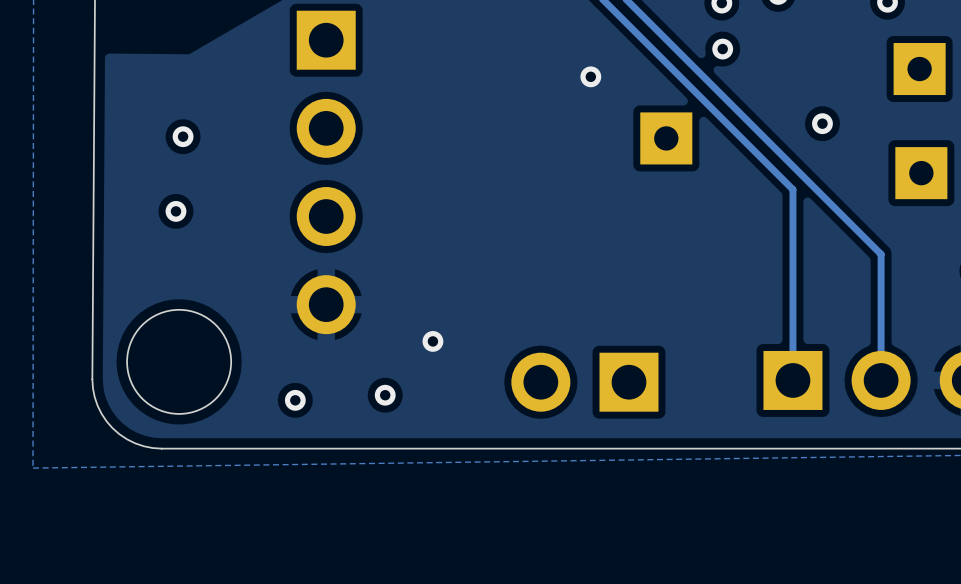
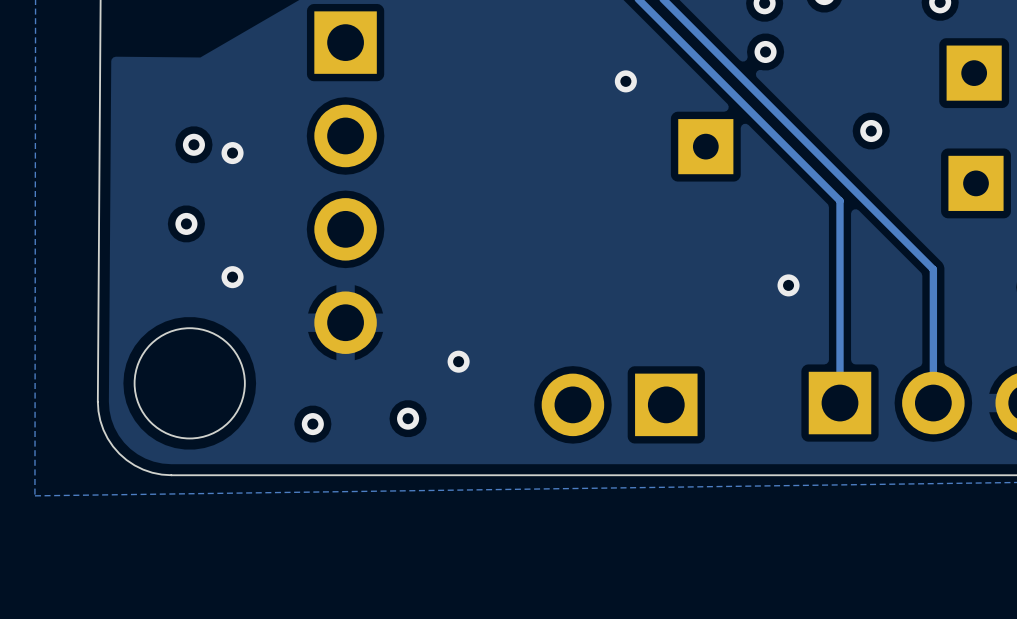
via: none -> (232, 153)
via: none -> (232, 277)
via: none -> (788, 285)

